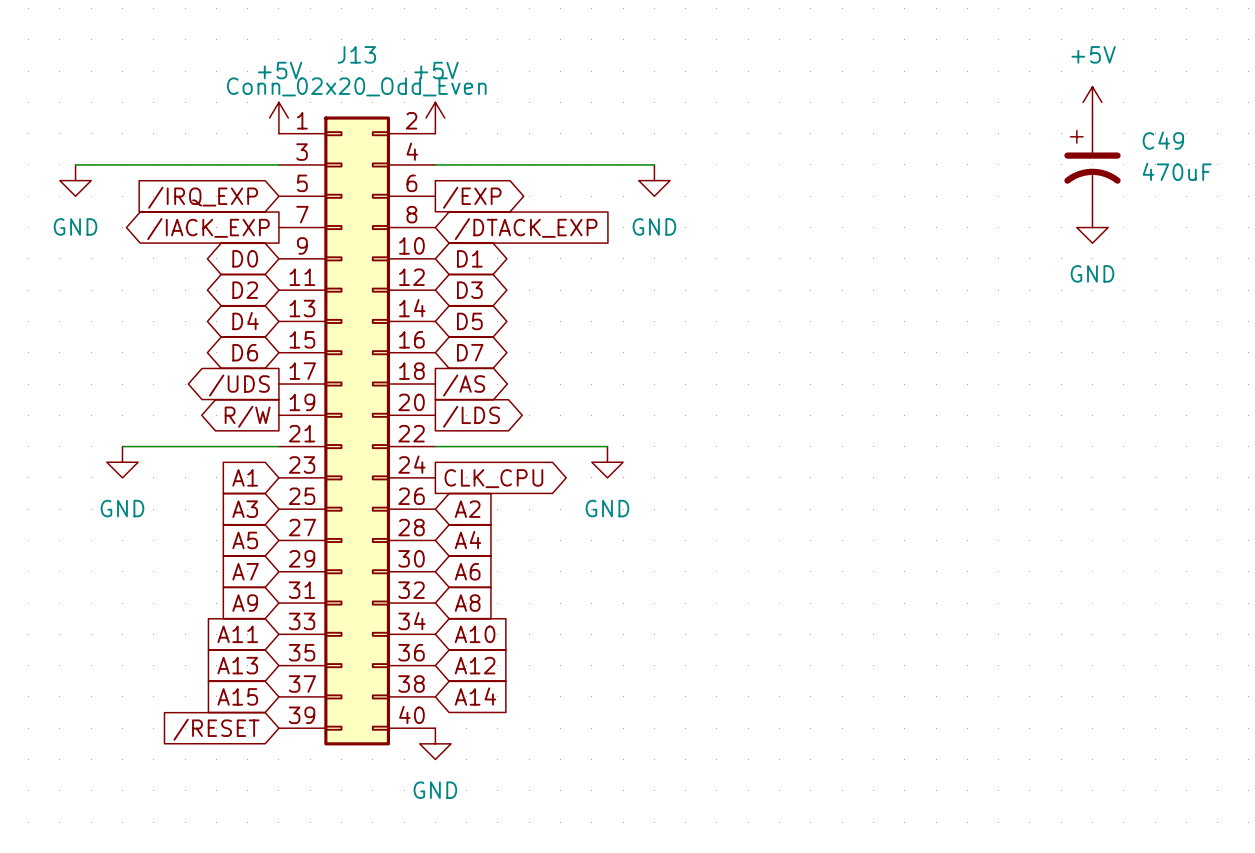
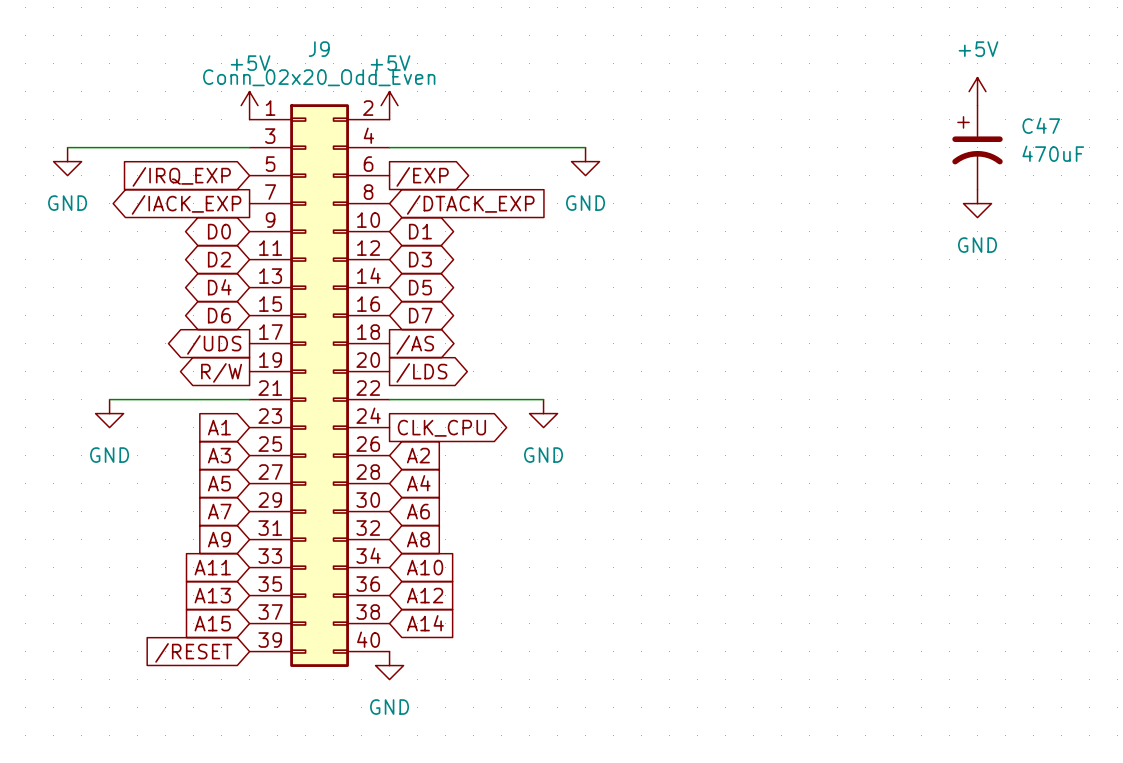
J13 name: J13 (356, 54) -> J9 (319, 49)
C49 name: C49 (1163, 140) -> C47 (1041, 125)

